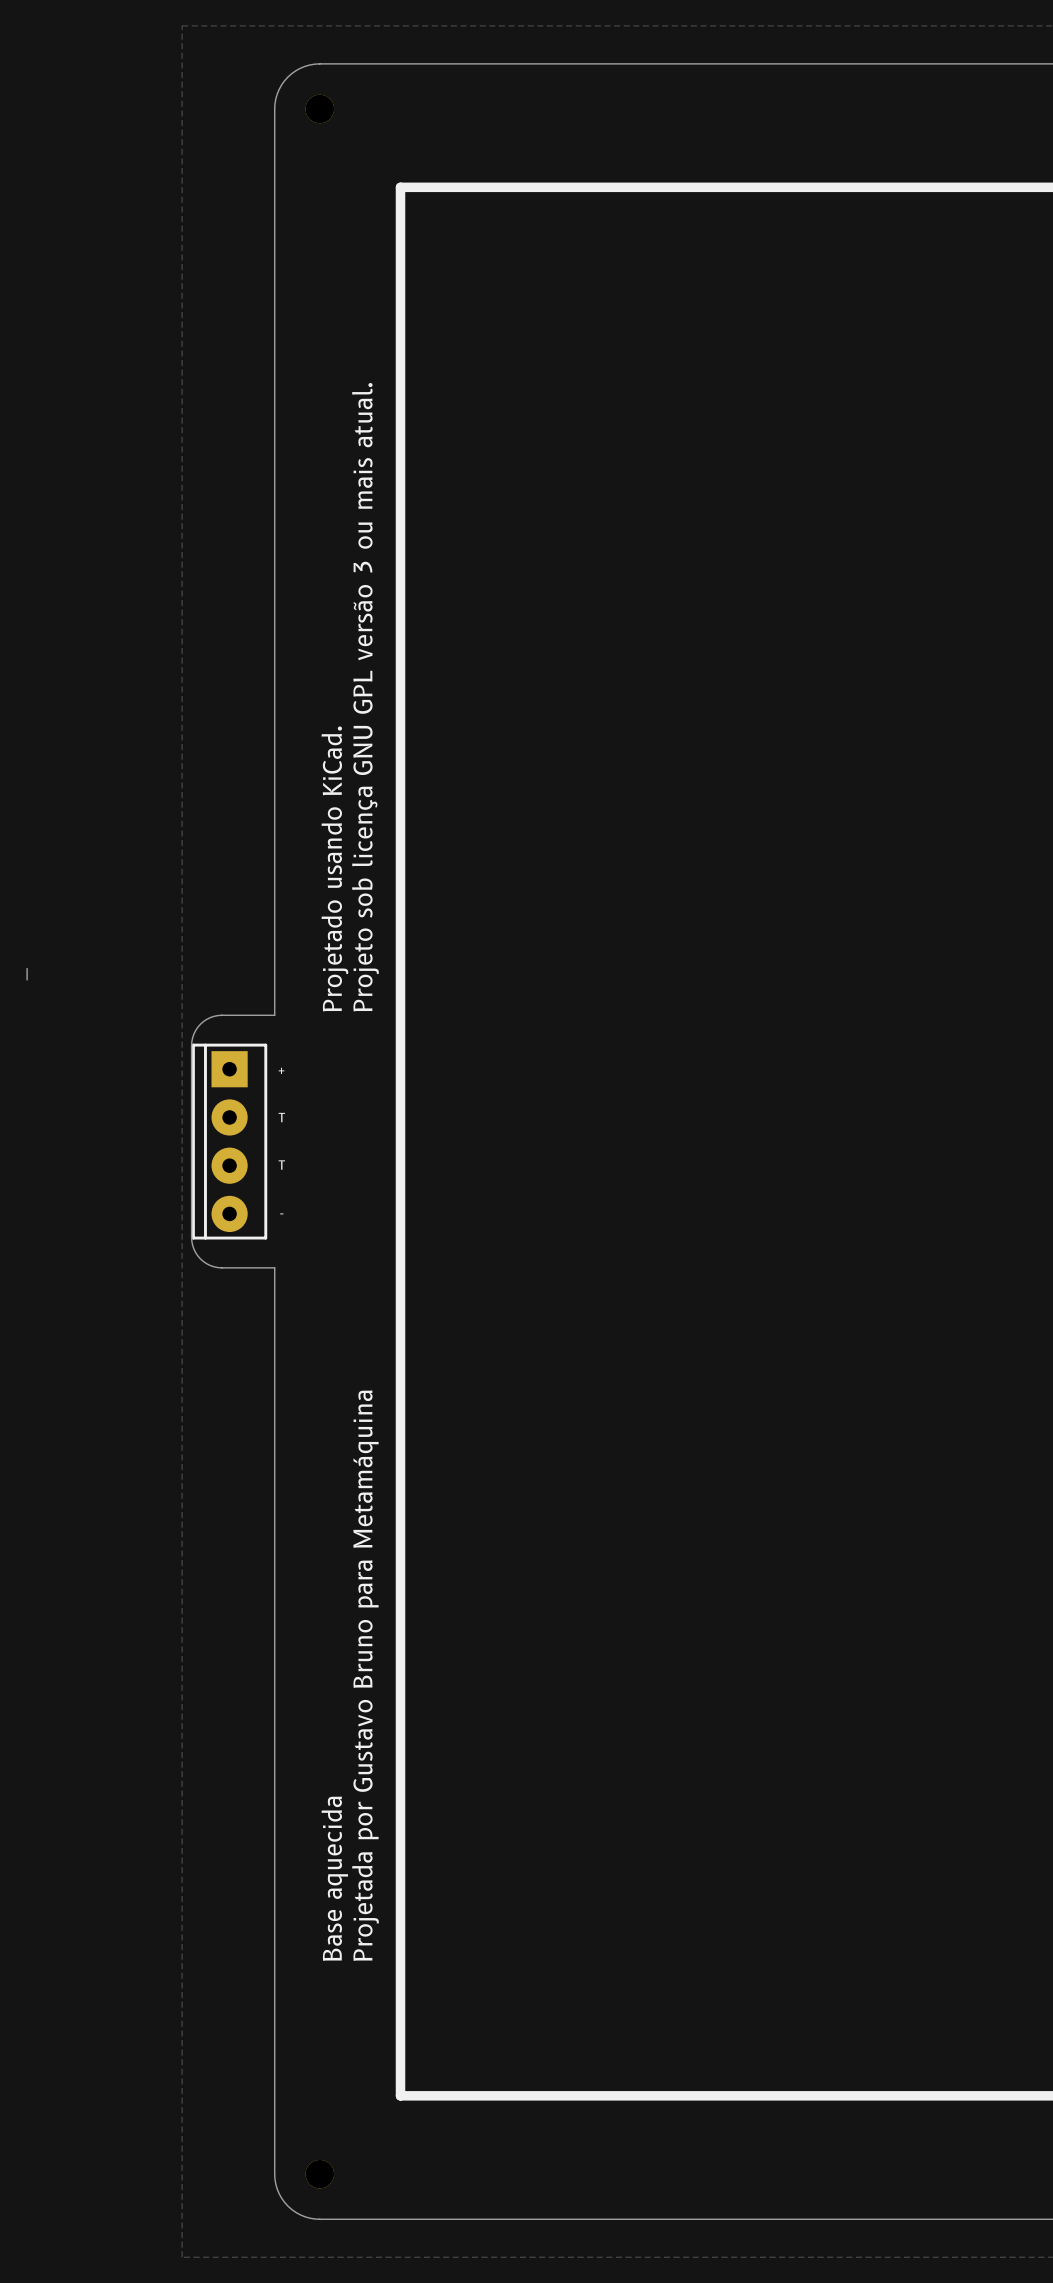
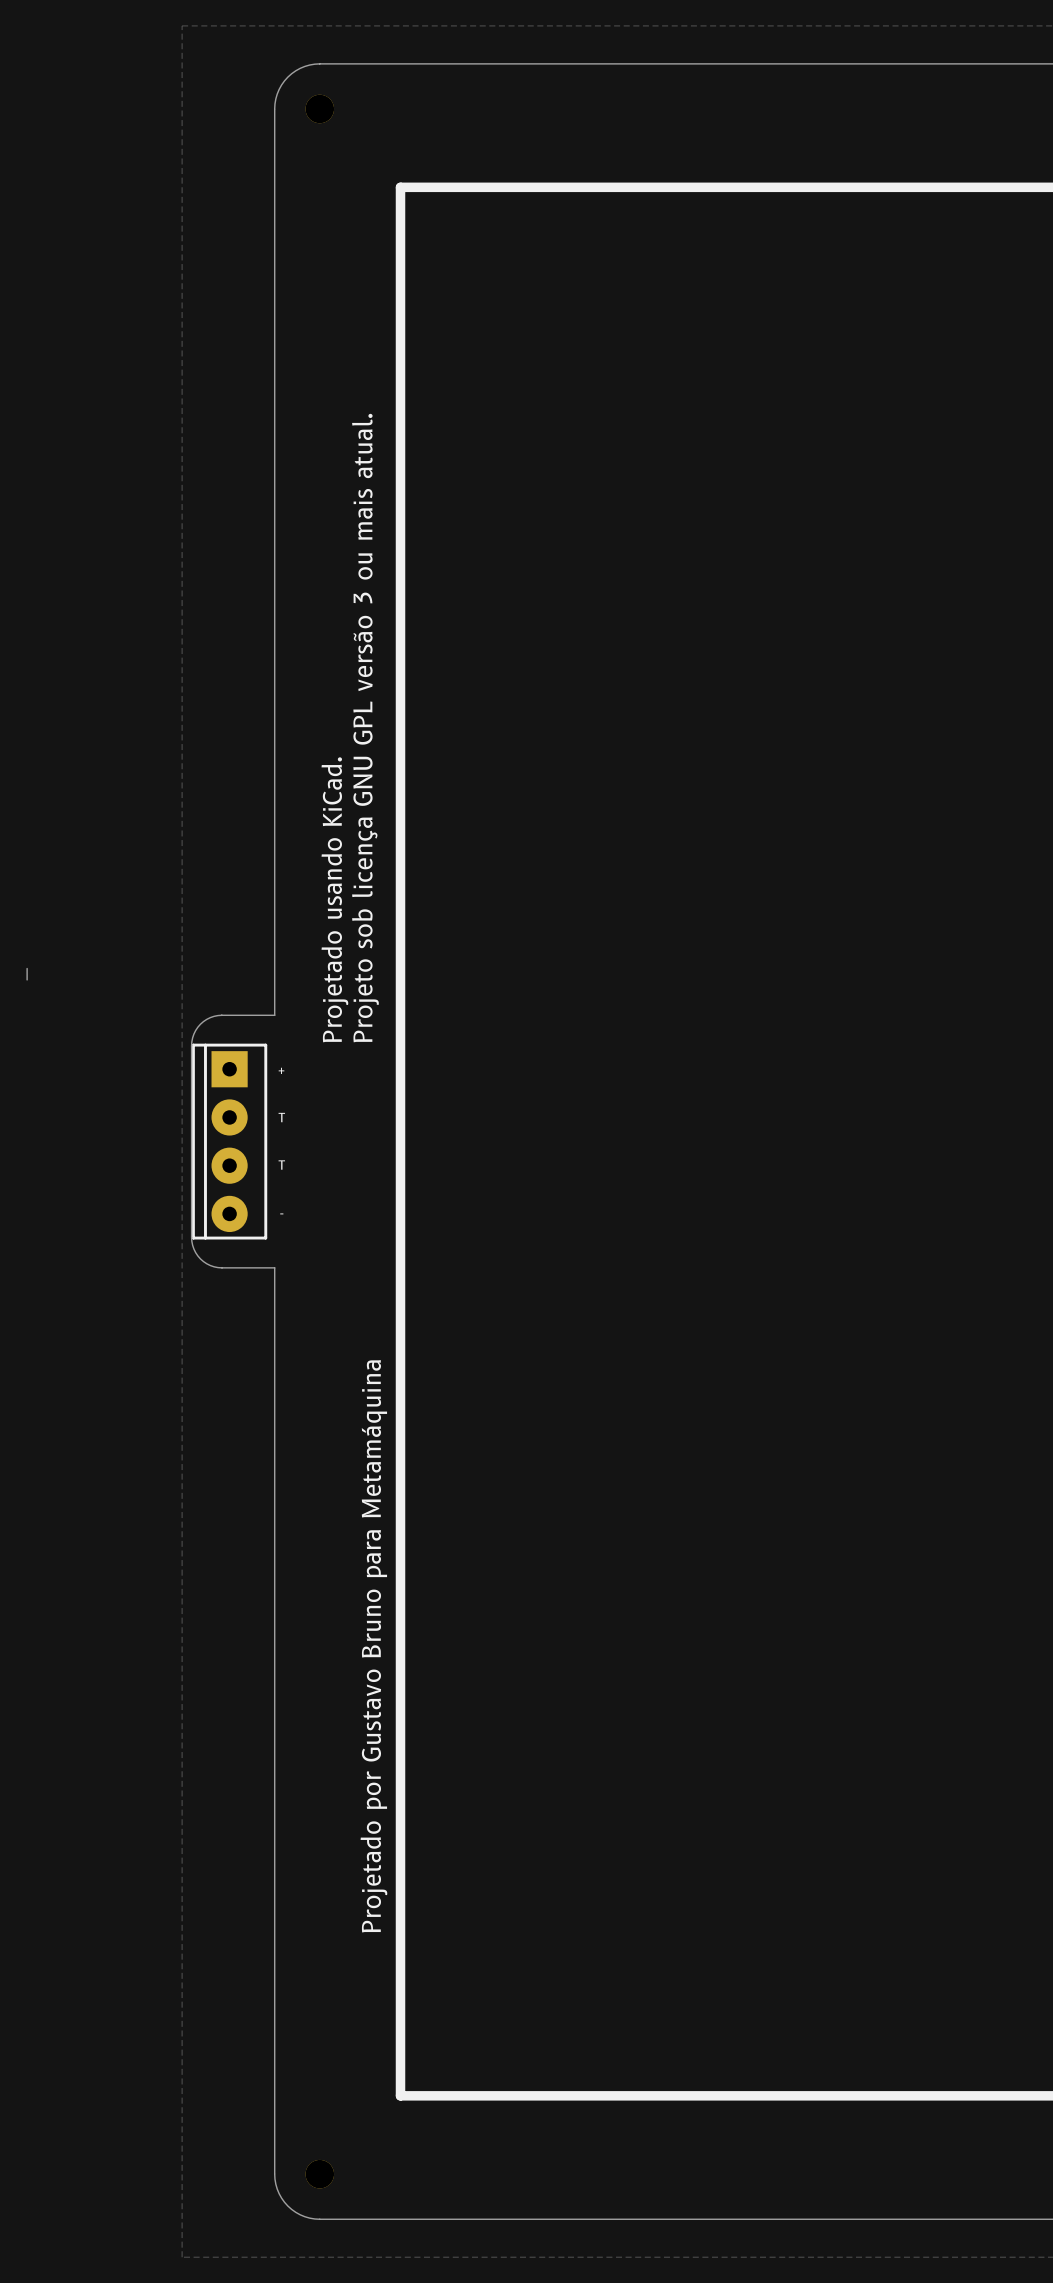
text position: Projeto sob licença GNU GPL versão 3 ou mais atual. (365, 697) -> Projeto sob licença GNU GPL versão 3 ou mais atual. (365, 728)
text position: Projetado usando KiCad. (334, 868) -> Projetado usando KiCad. (334, 899)
text: Projetada por Gustavo Bruno para Metamáquina (365, 1675) -> Projetado por Gustavo Bruno para Metamáquina (373, 1646)
text: Base aquecida (334, 1878) -> none

